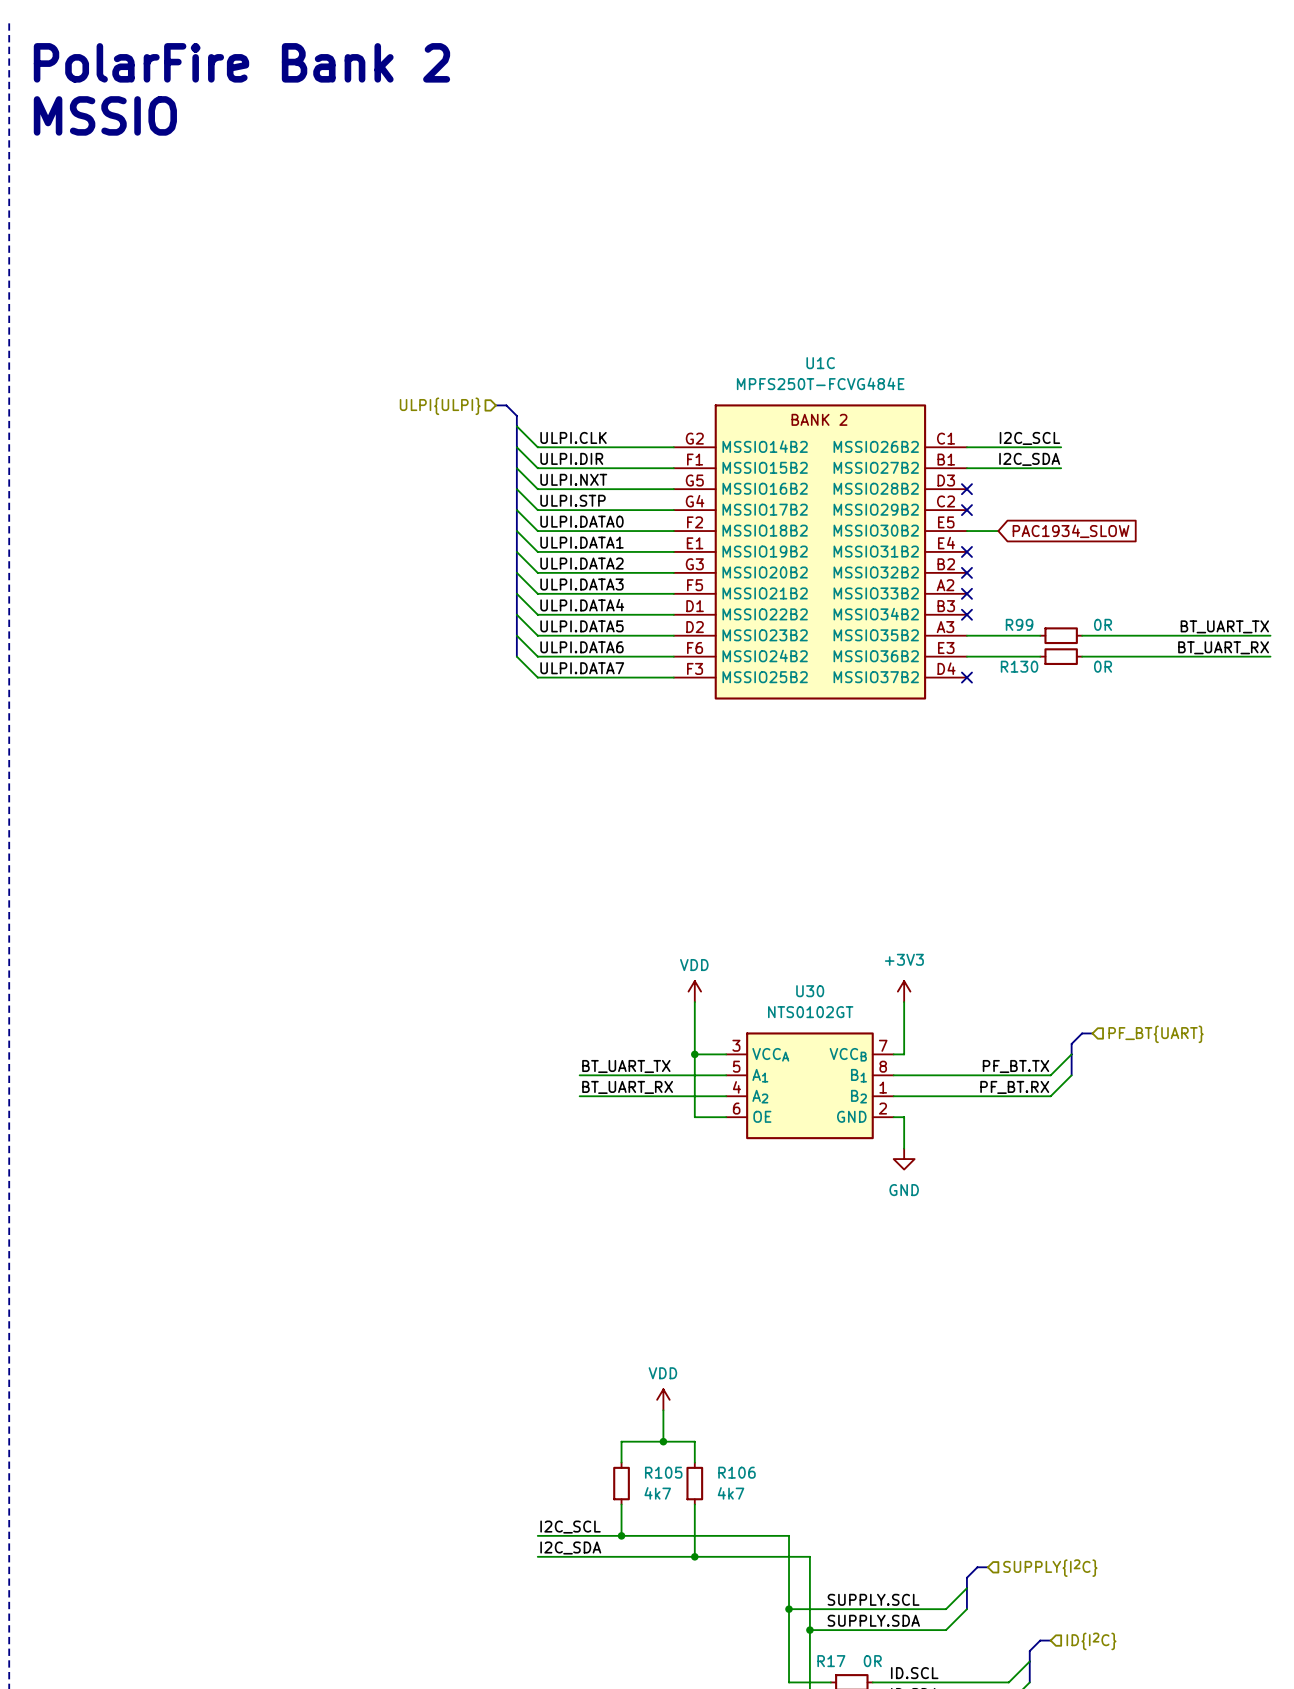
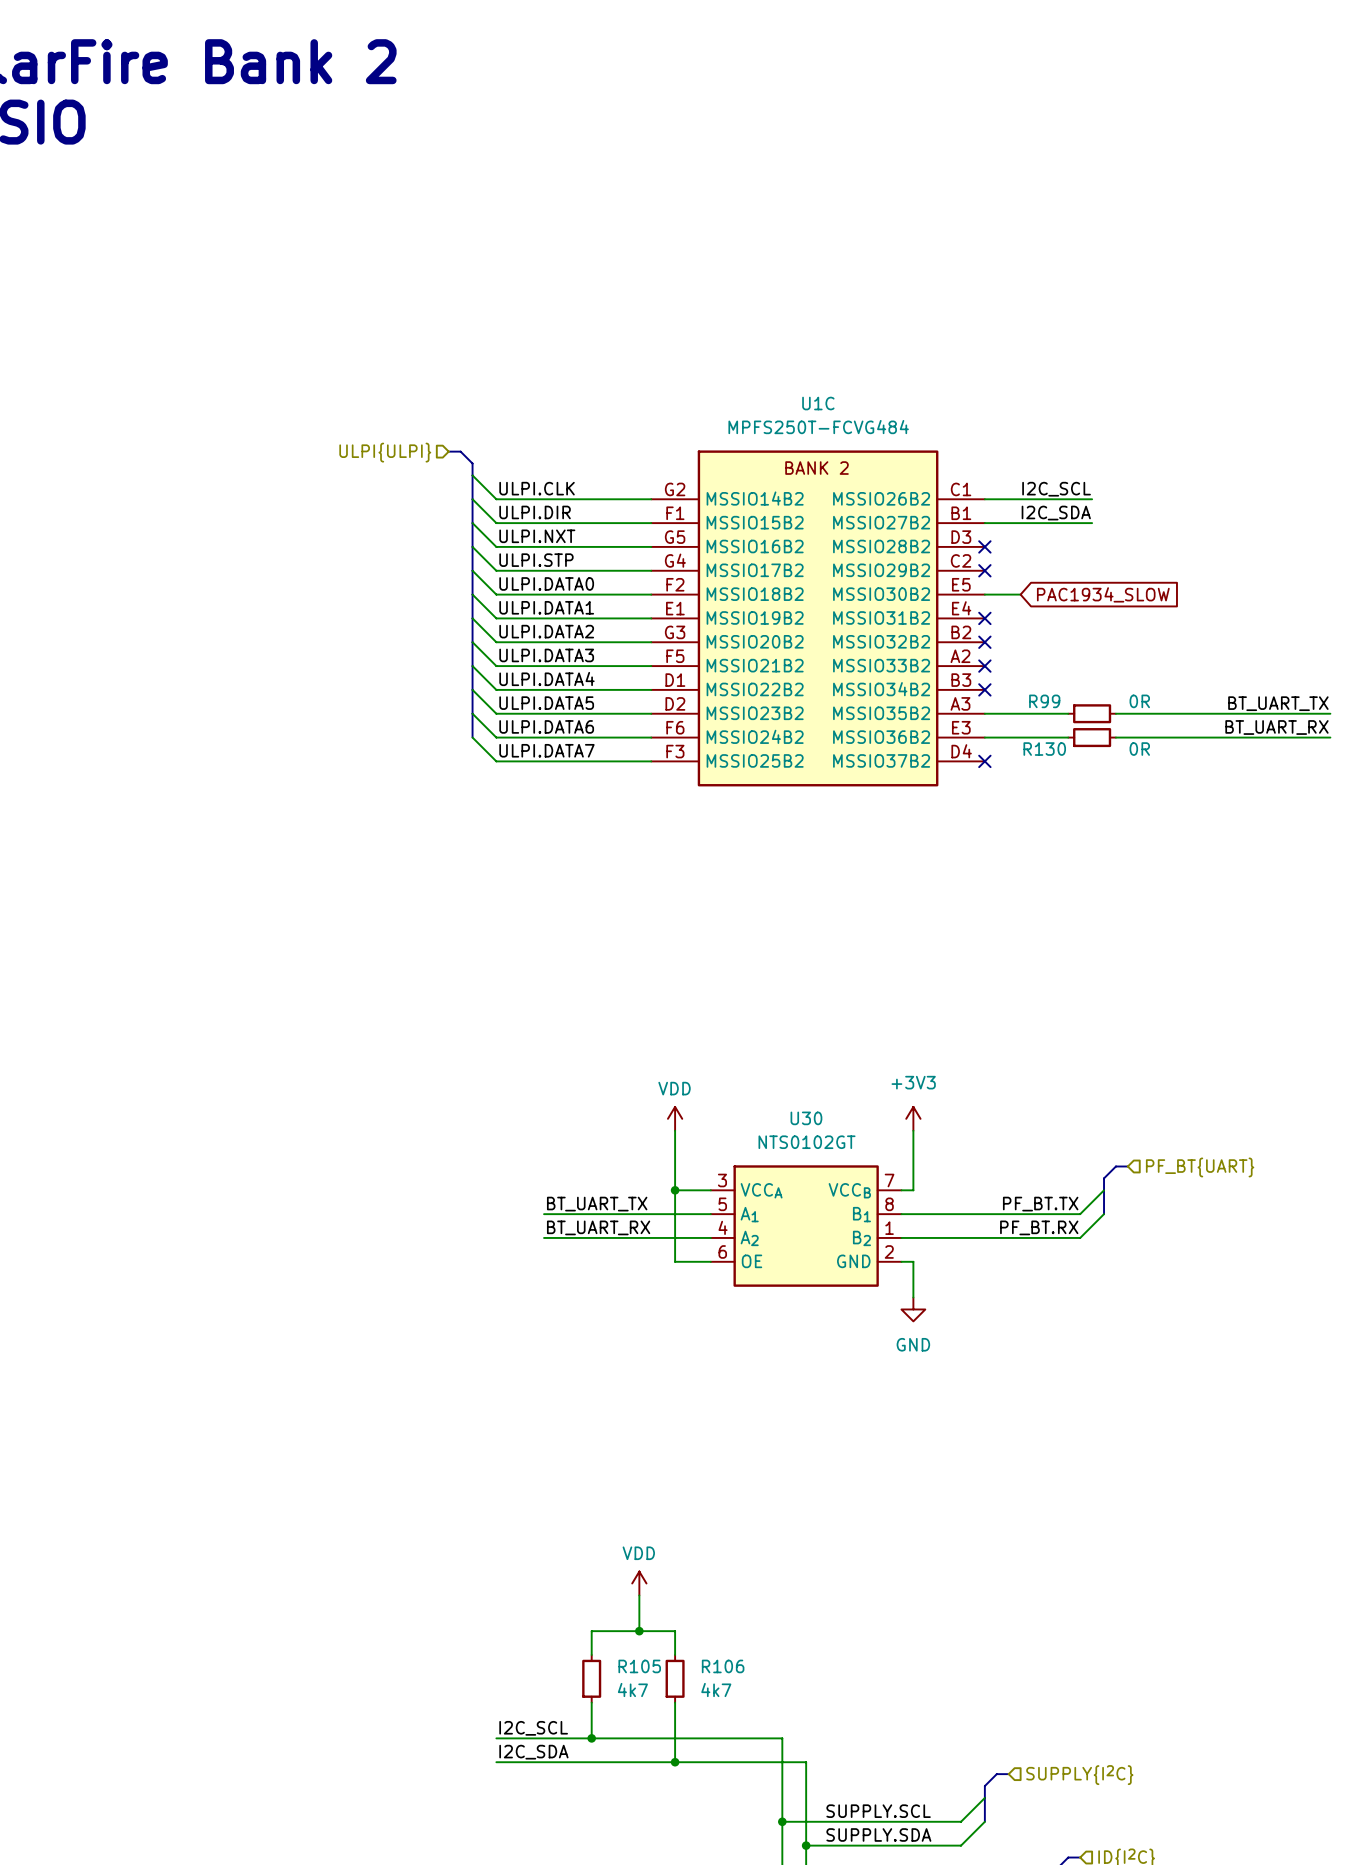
U1C text: MPFS250T-FCVG484E (820, 383) -> MPFS250T-FCVG484 (818, 427)

